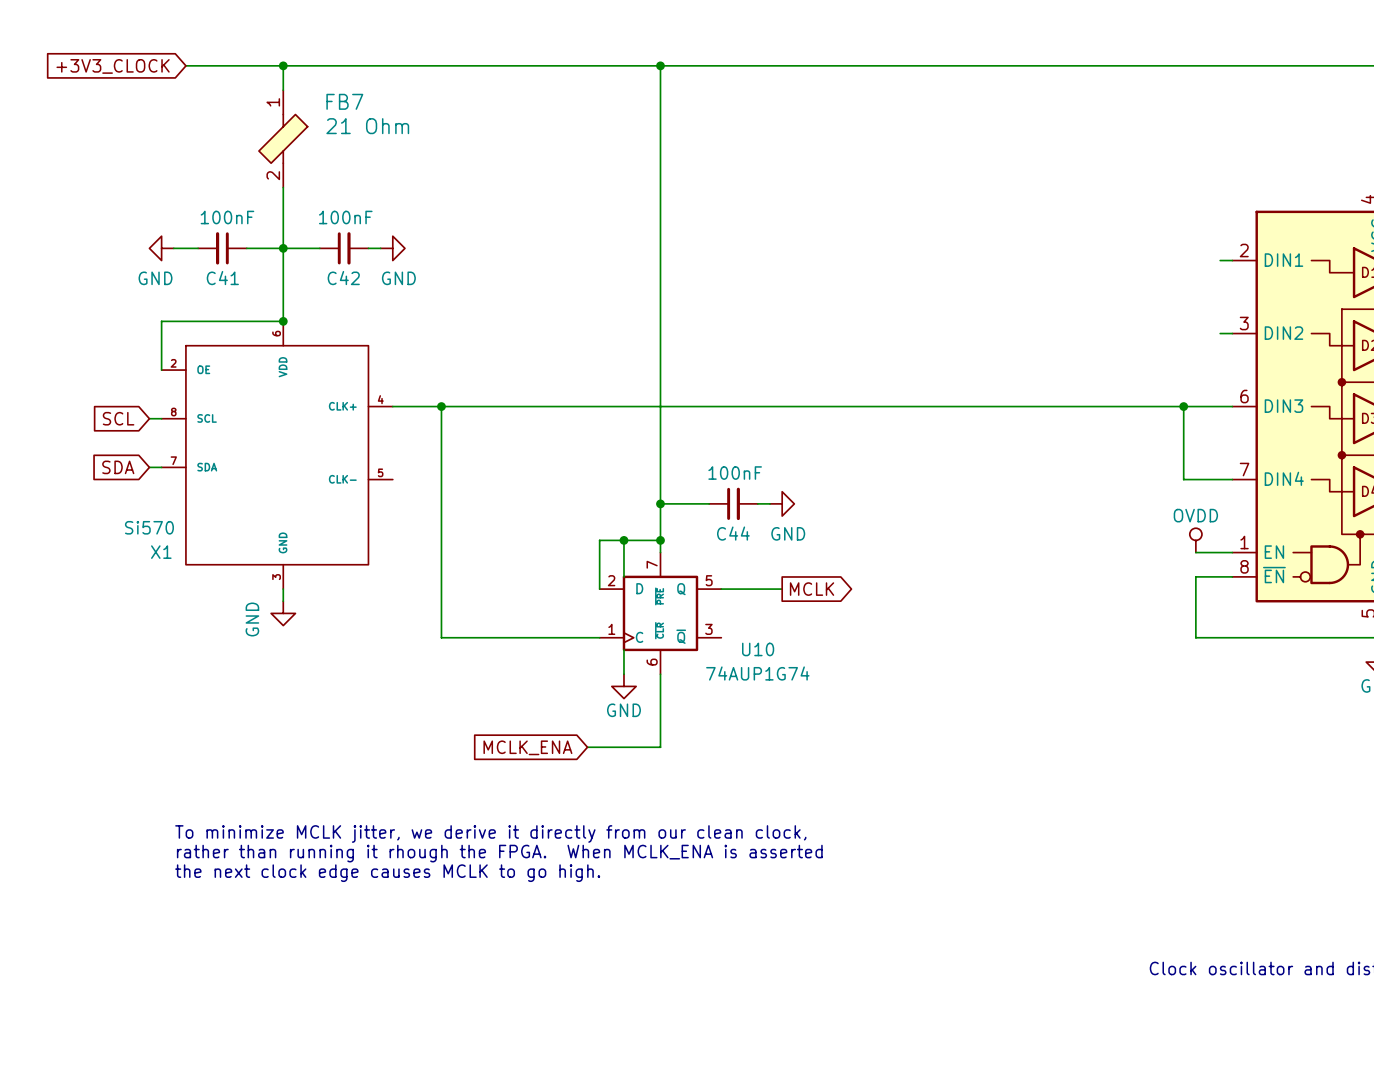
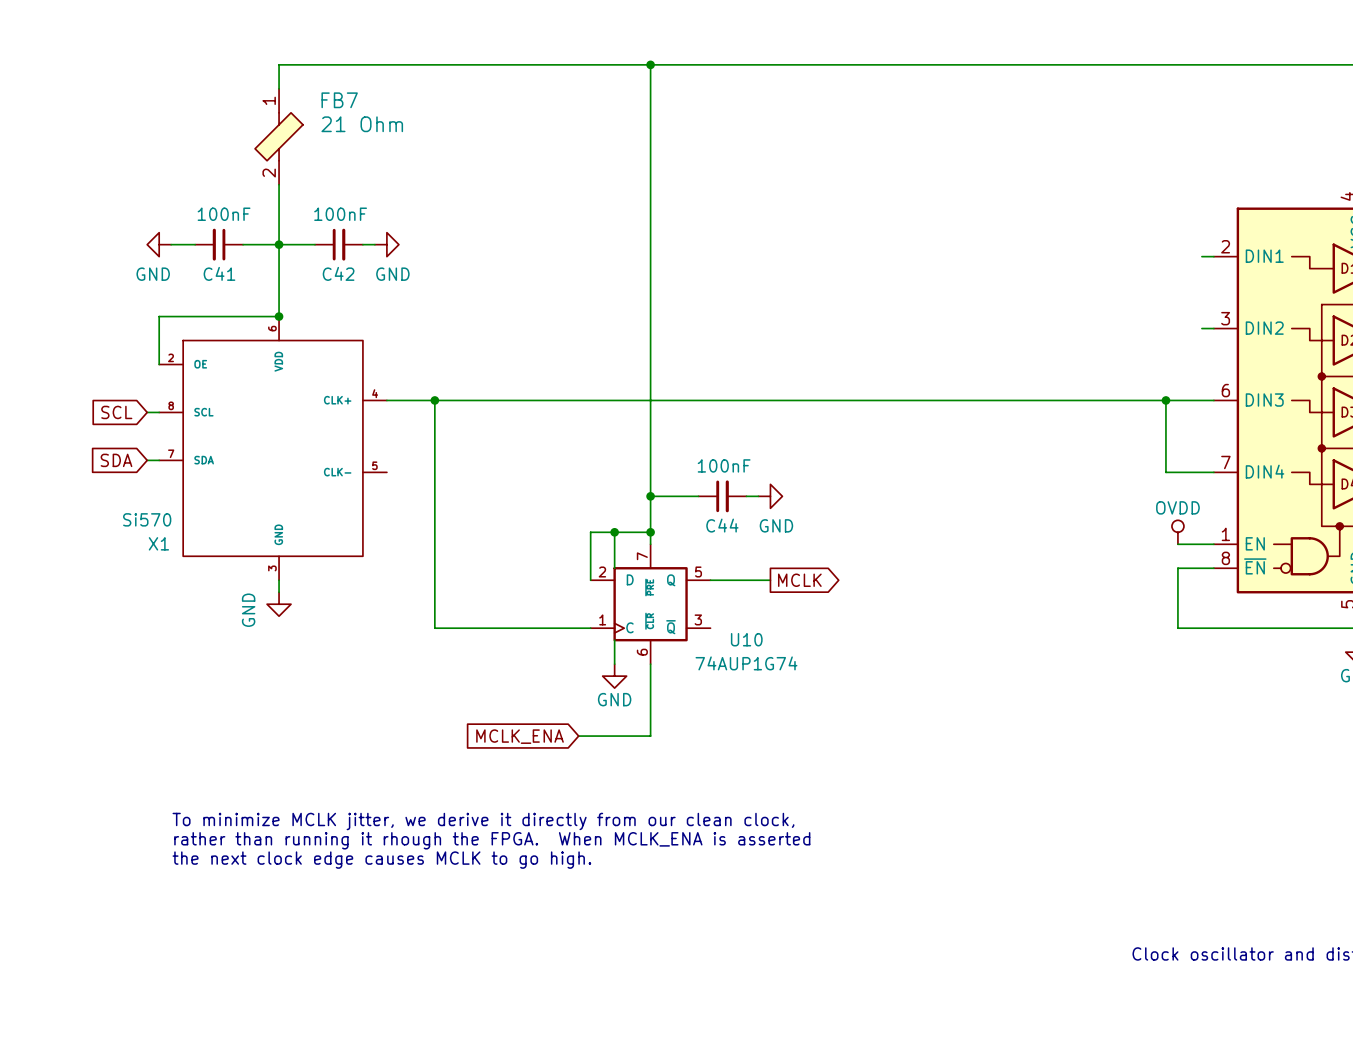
wire: (185, 65) (283, 65) -> none
junction: (283, 65) -> none
global label: +3V3_CLOCK (113, 66) -> none

